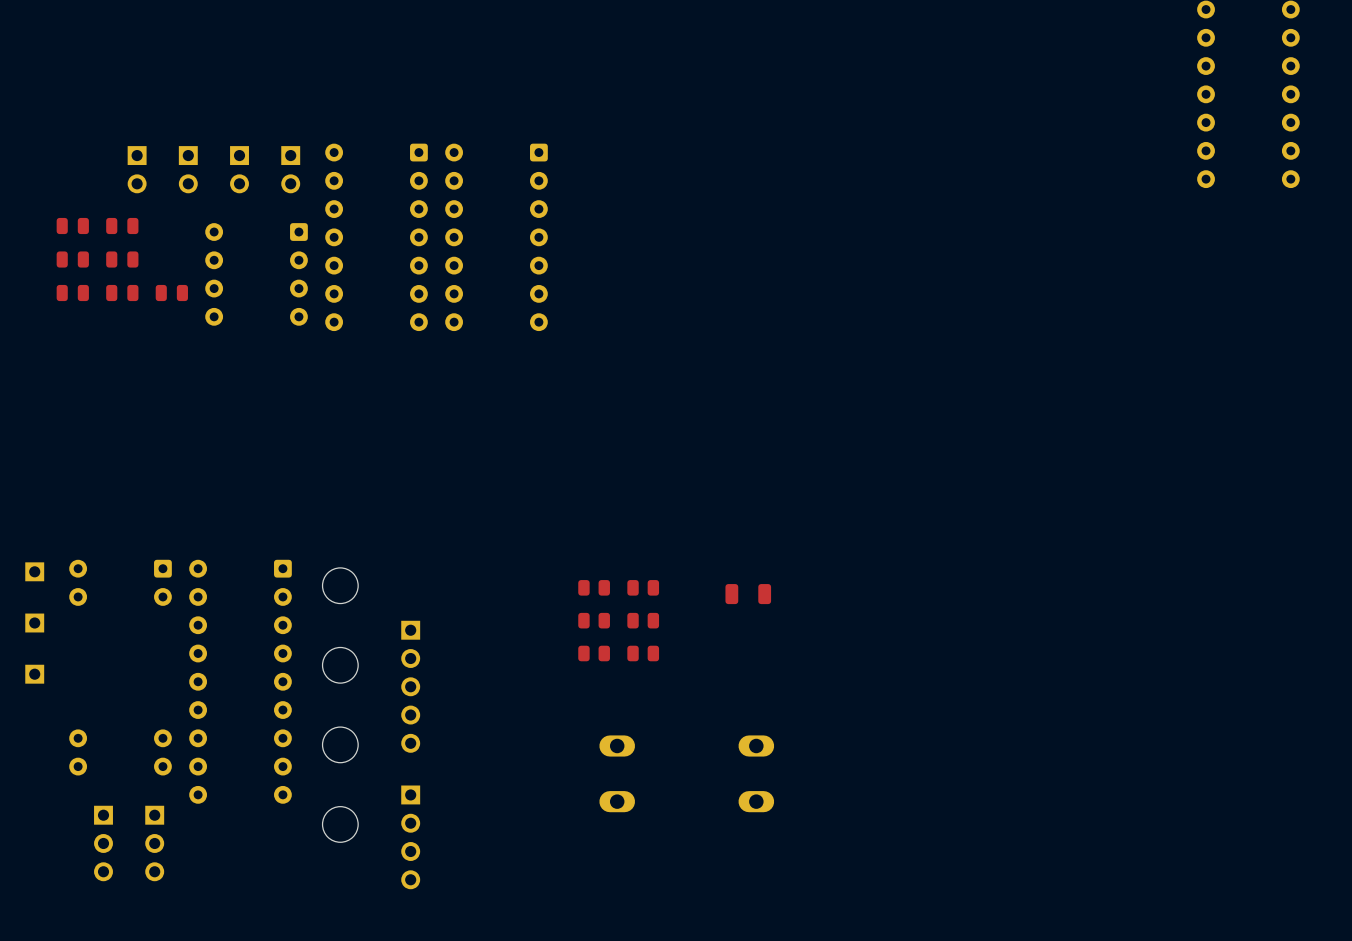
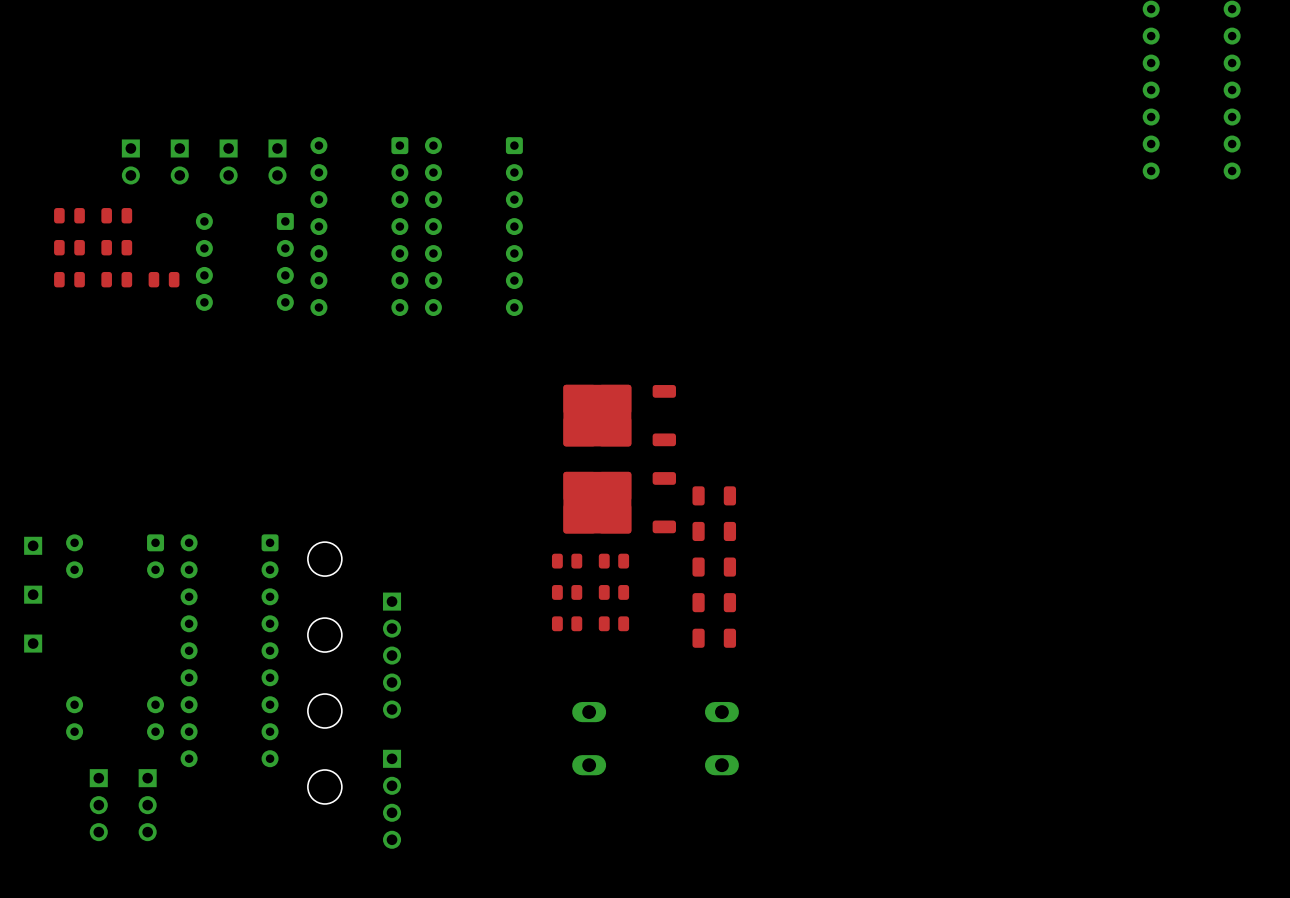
part: none -> (619, 415)
part: none -> (714, 495)
part: none -> (619, 502)
part: none -> (714, 531)
part: none -> (714, 602)
part: none -> (714, 638)

